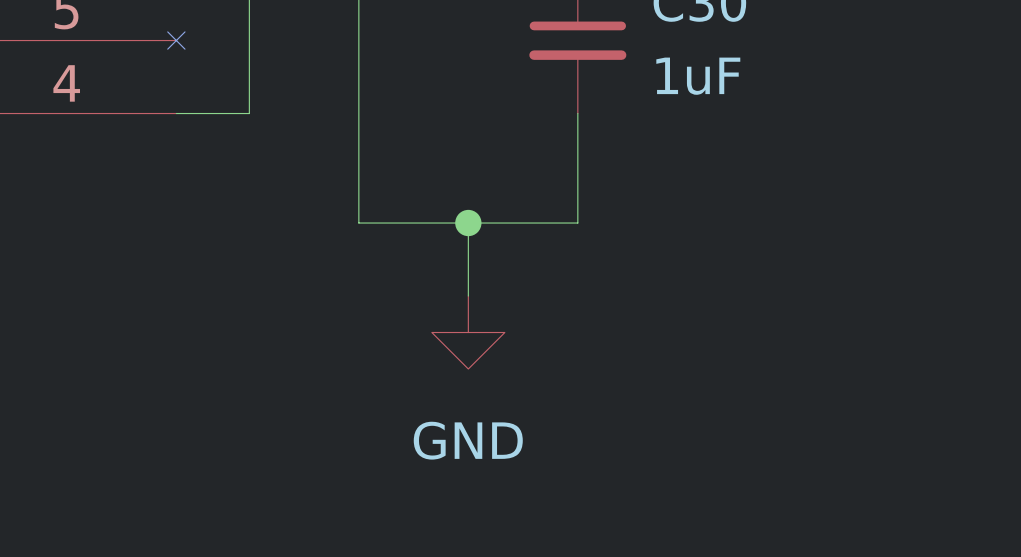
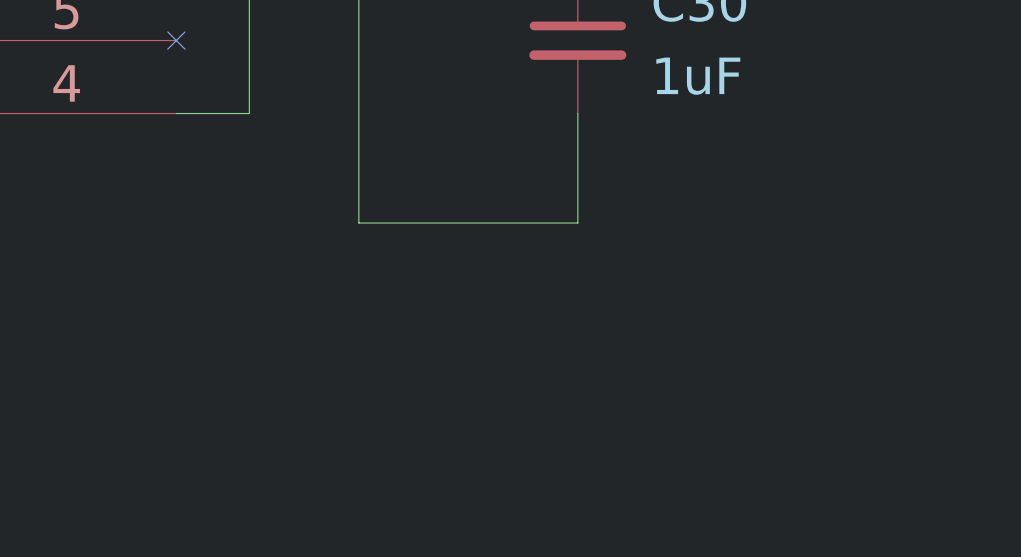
wire: (468, 223) (468, 296) -> none
junction: (468, 223) -> none
power symbol: GND (468, 332) -> none

